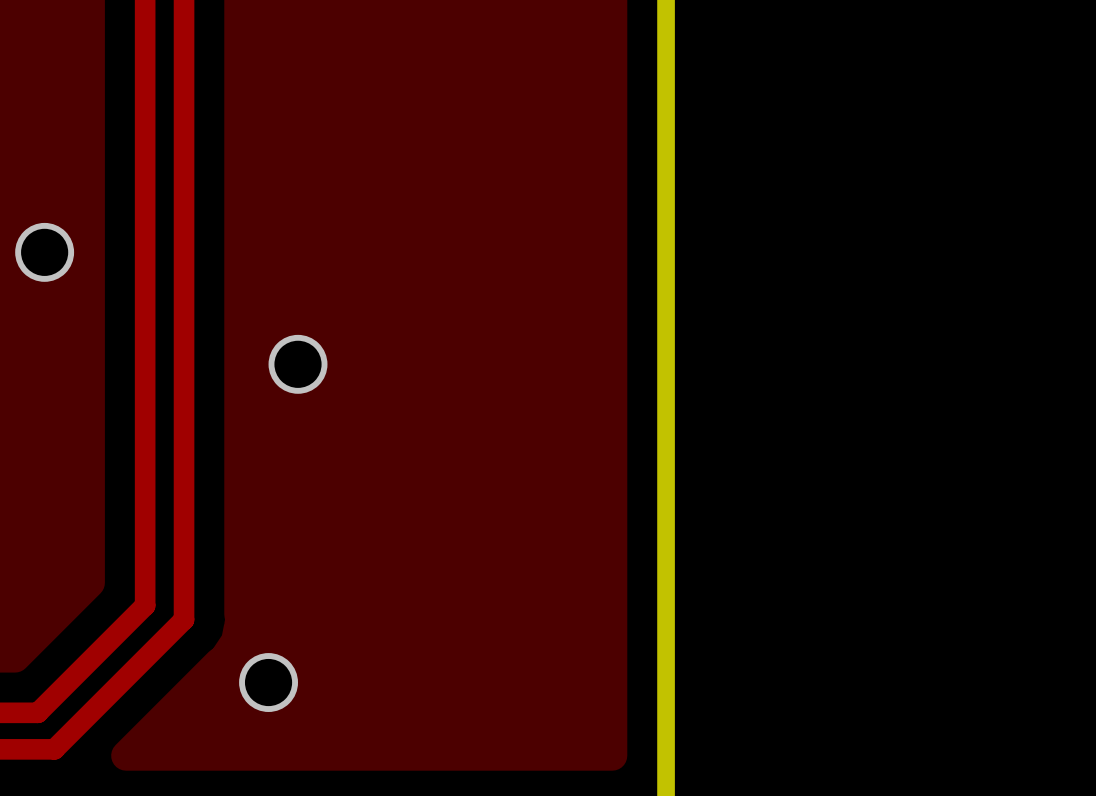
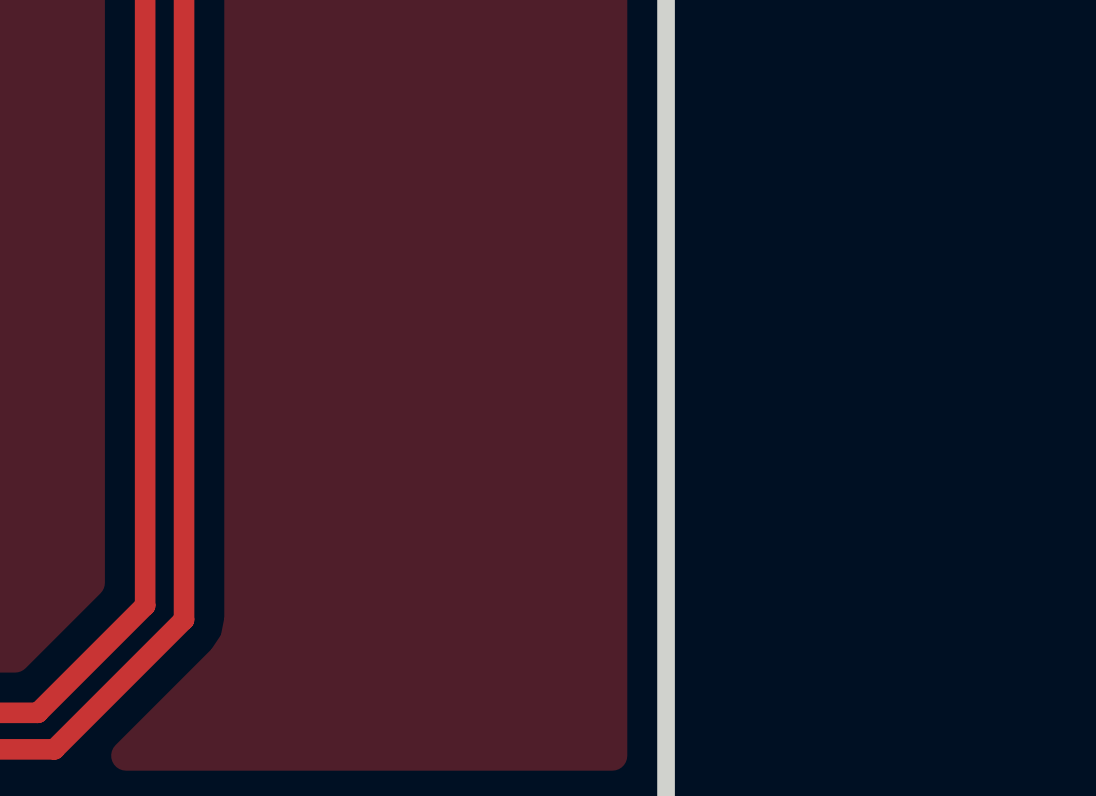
via: (44, 252) -> none
via: (298, 364) -> none
via: (268, 682) -> none

